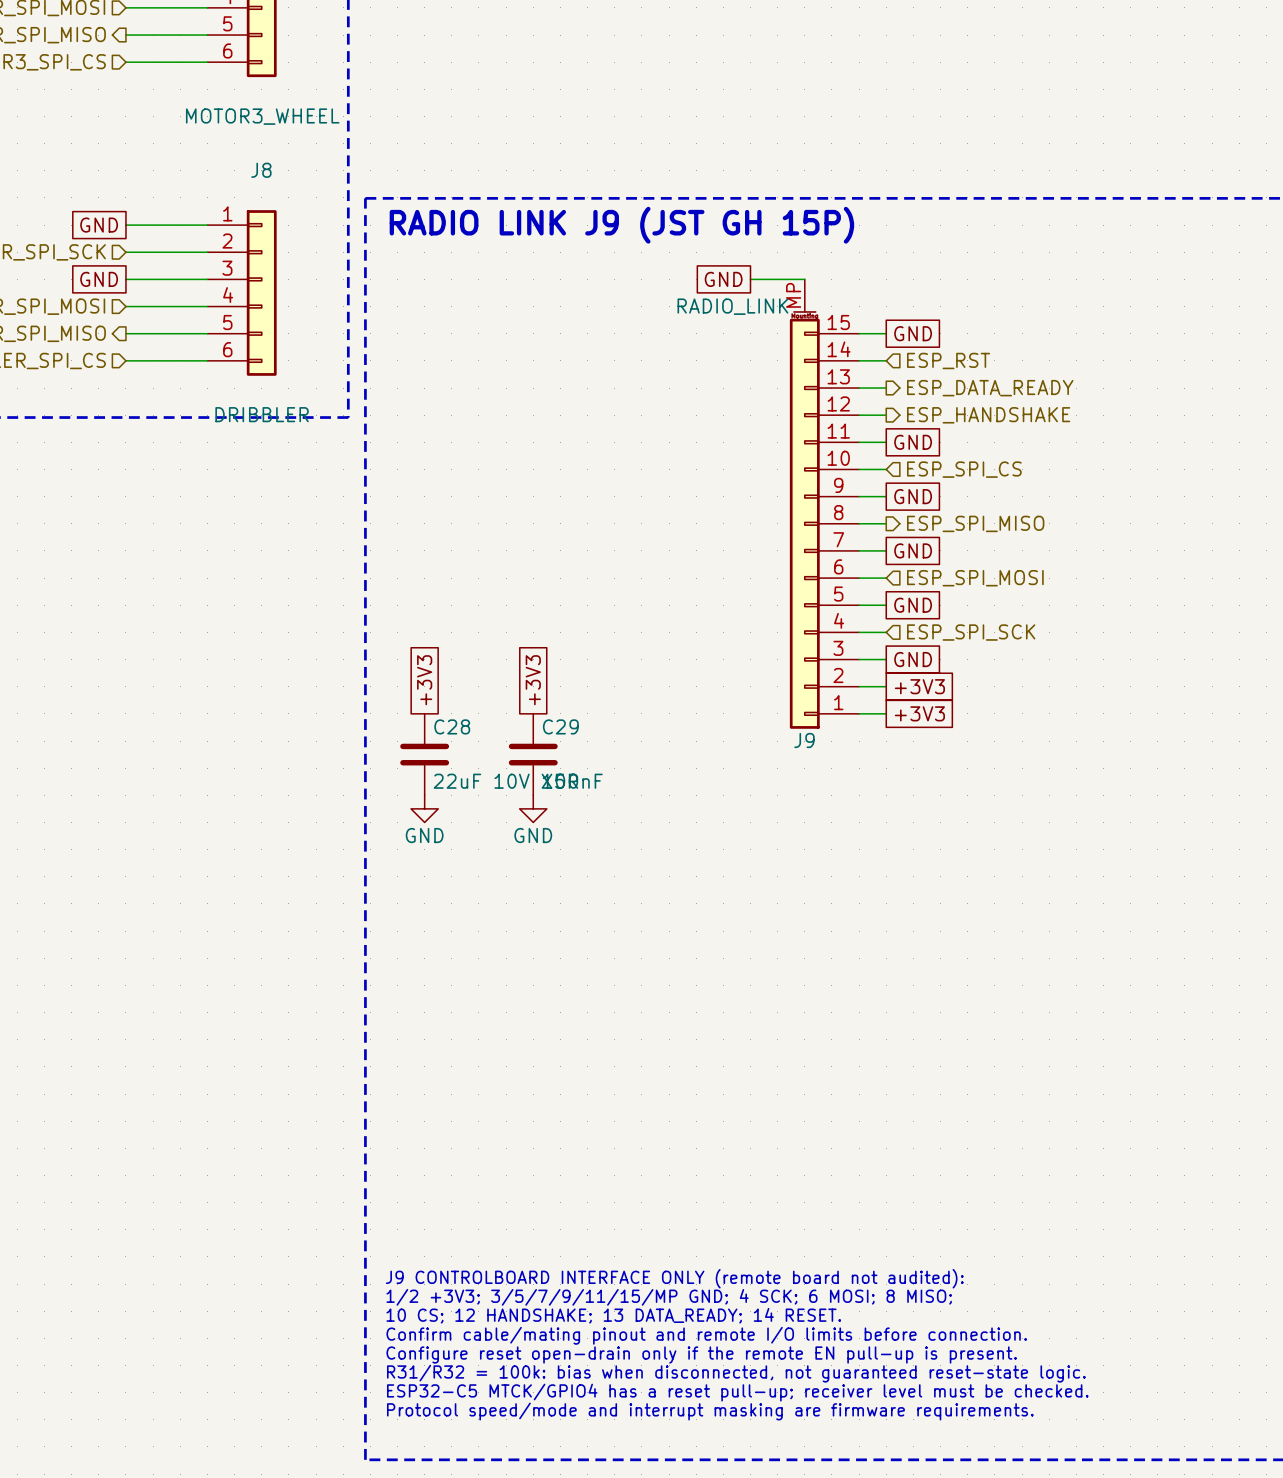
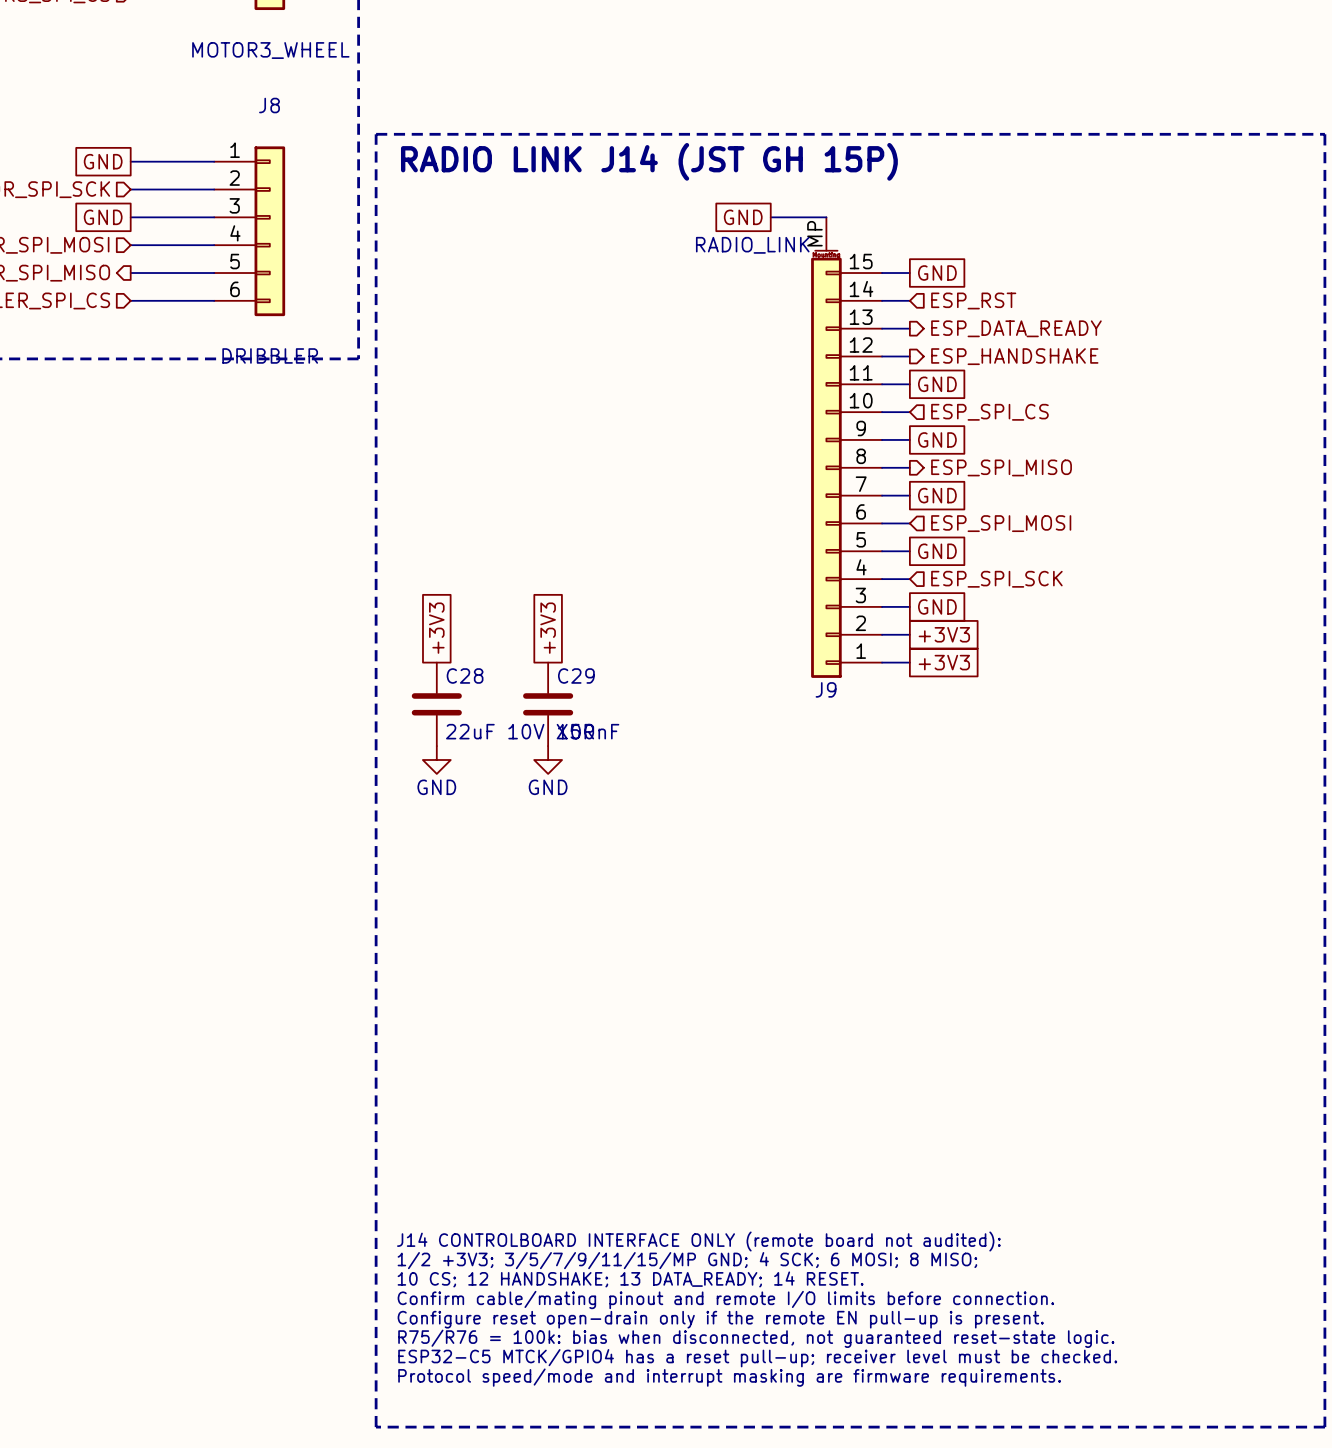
text: RADIO LINK J9 (JST GH 15P) (621, 225) -> RADIO LINK J14 (JST GH 15P) (649, 161)
text: J9 CONTROLBOARD INTERFACE ONLY (remote board not audited): (674, 1278) -> J14 CONTROLBOARD INTERFACE ONLY (remote board not audited): (698, 1241)
text: R31/R32 = 100k: bias when disconnected, not guaranteed reset-state logic. (736, 1373) -> R75/R76 = 100k: bias when disconnected, not guaranteed reset-state logic. (756, 1338)

